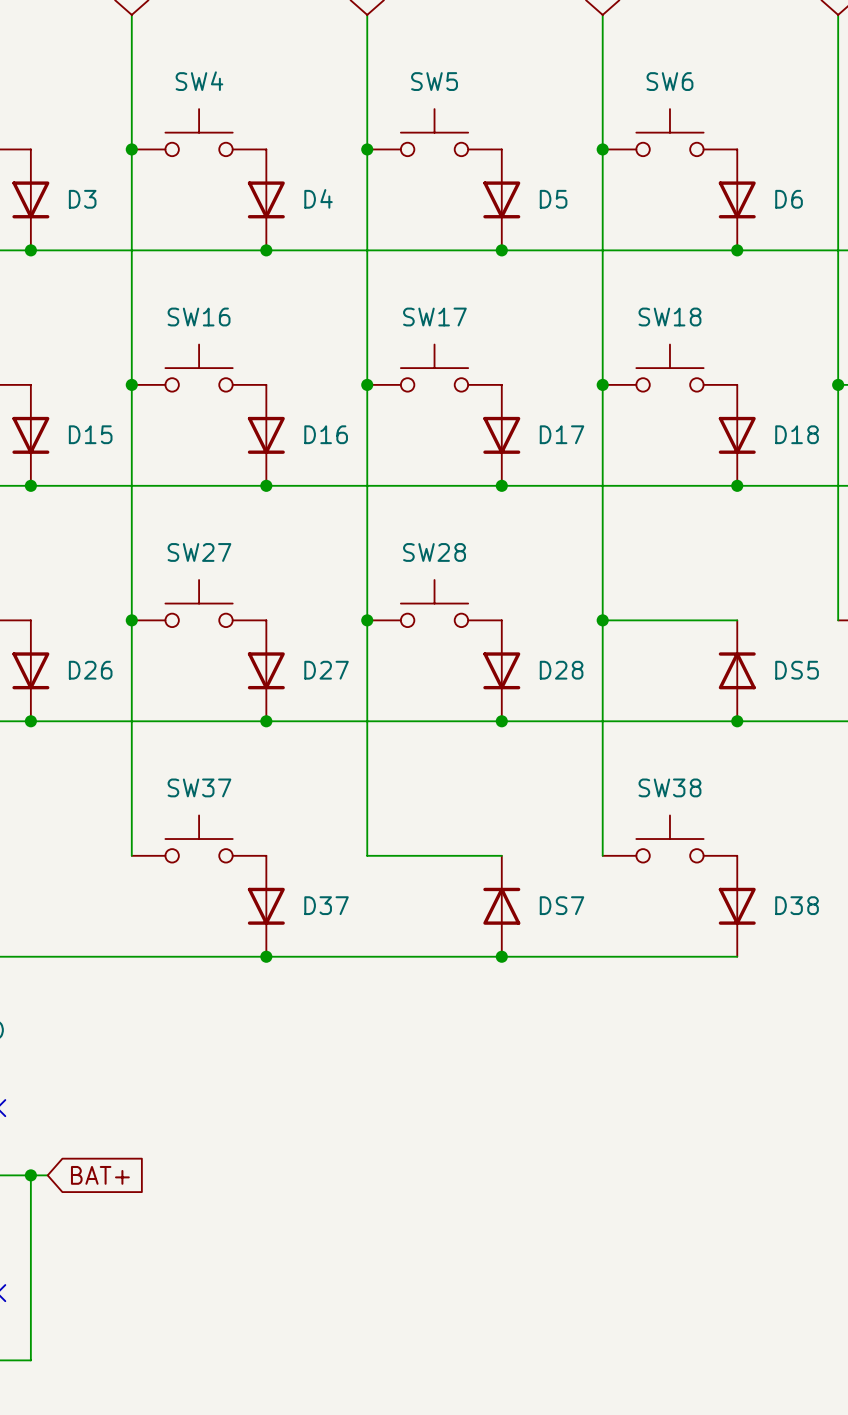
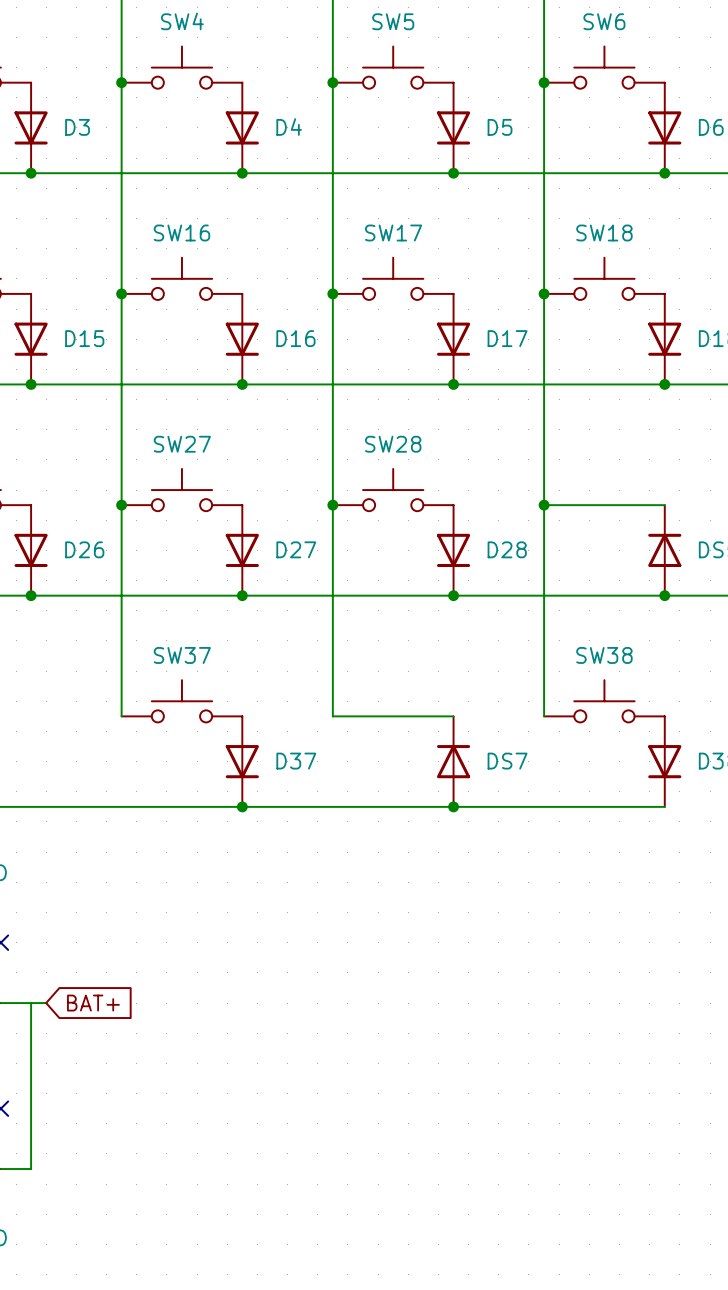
junction: (30, 1175) -> none

